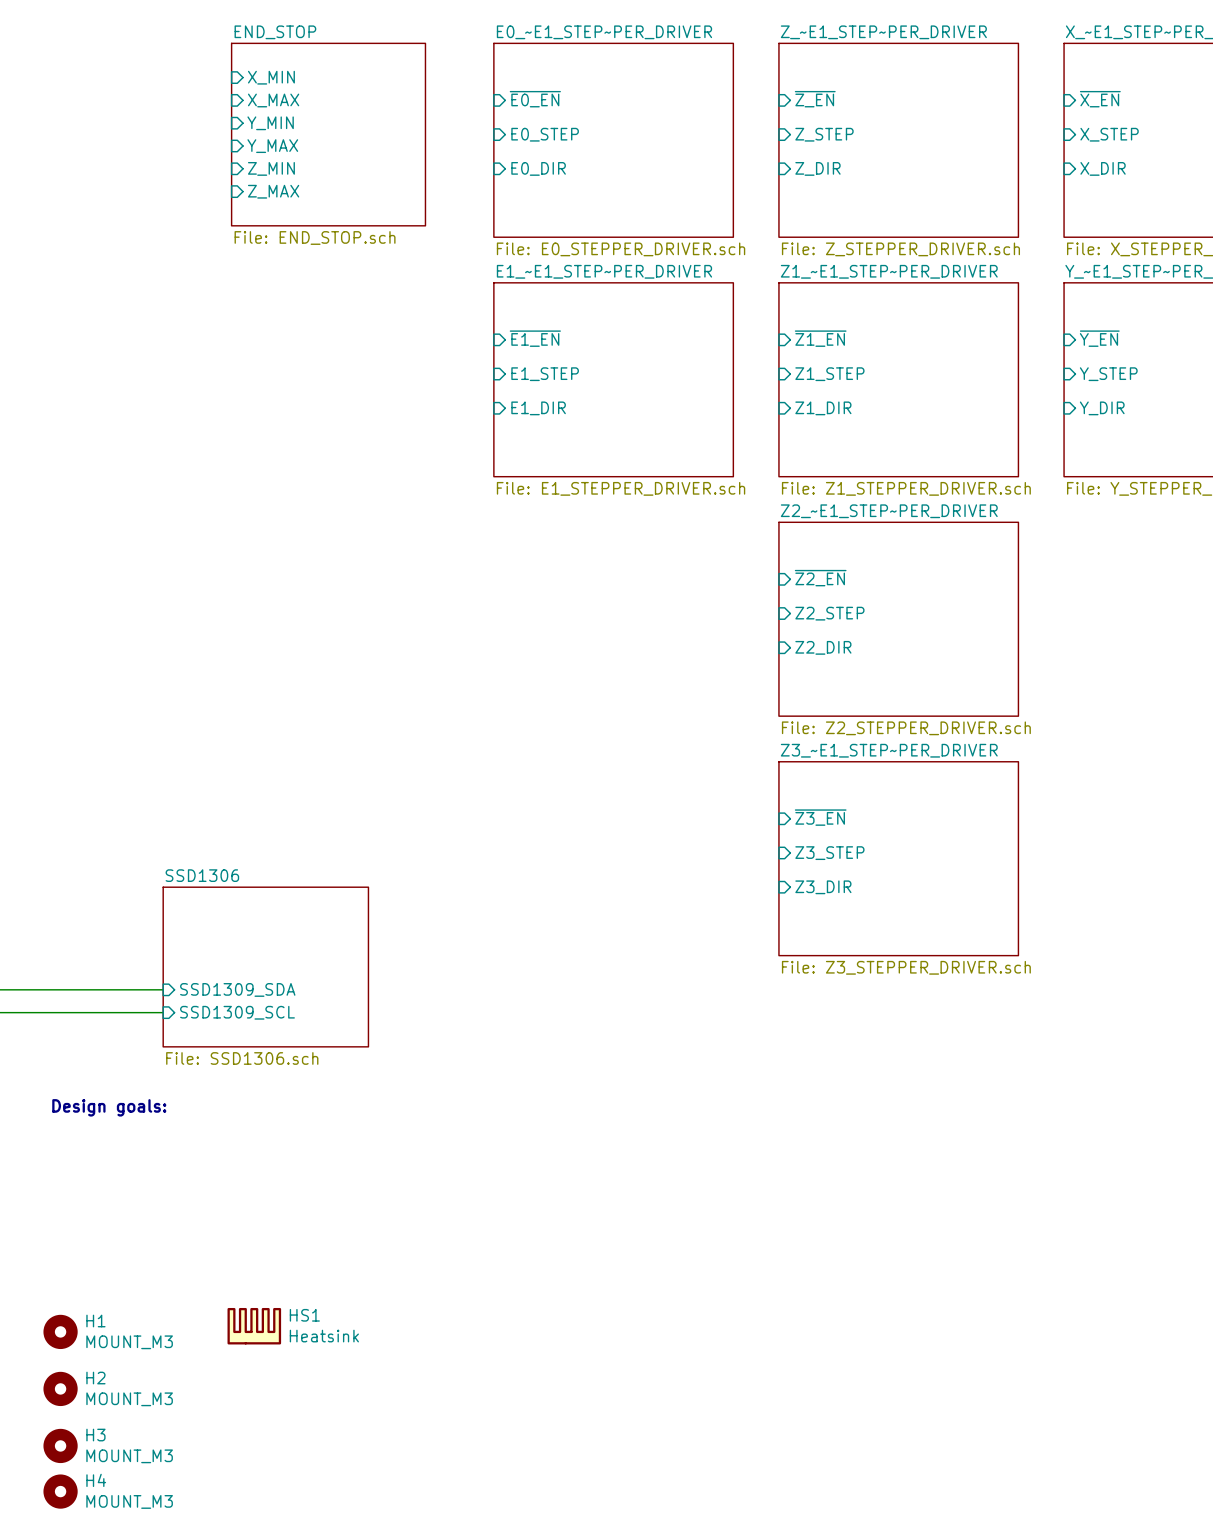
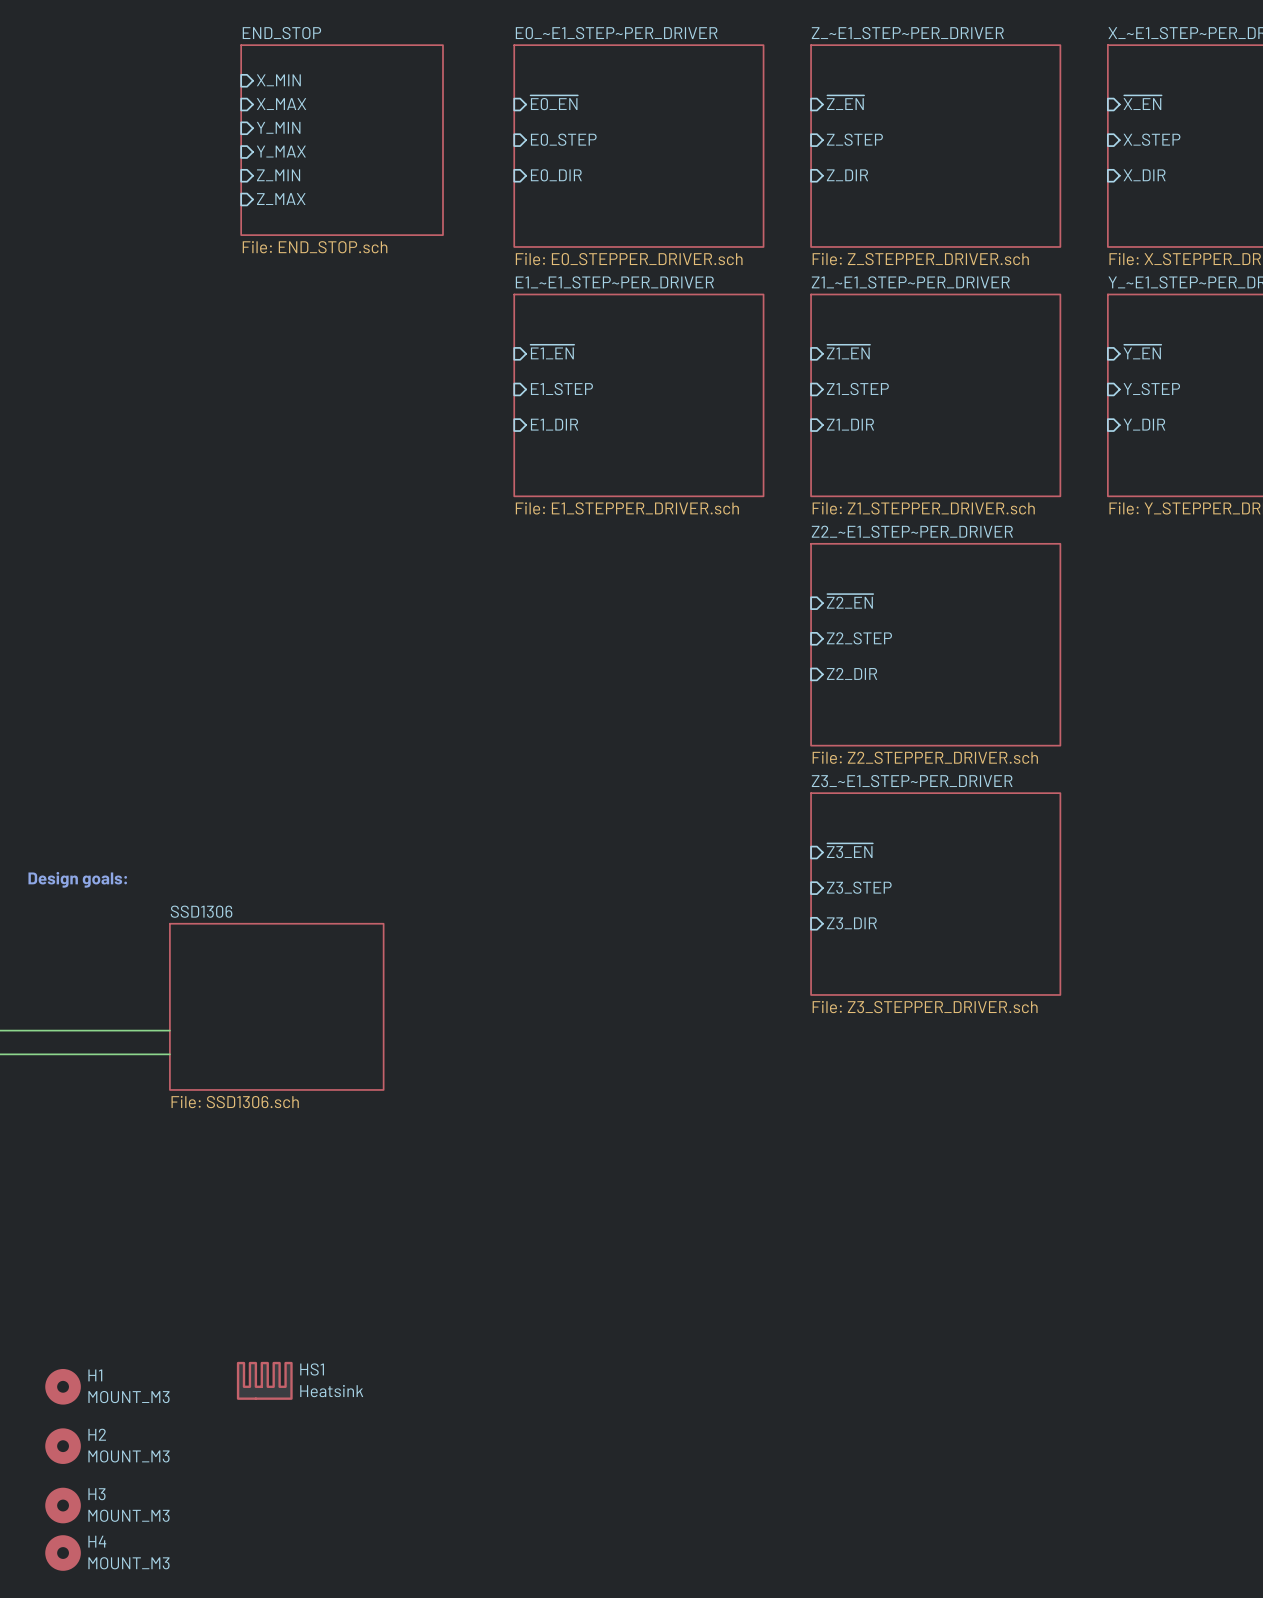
text: none -> Design goals: (77, 879)
sheet pin: SSD1309_SDA (237, 989) -> none
sheet pin: SSD1309_SCL (237, 1012) -> none
text: Design goals: (109, 1107) -> none

